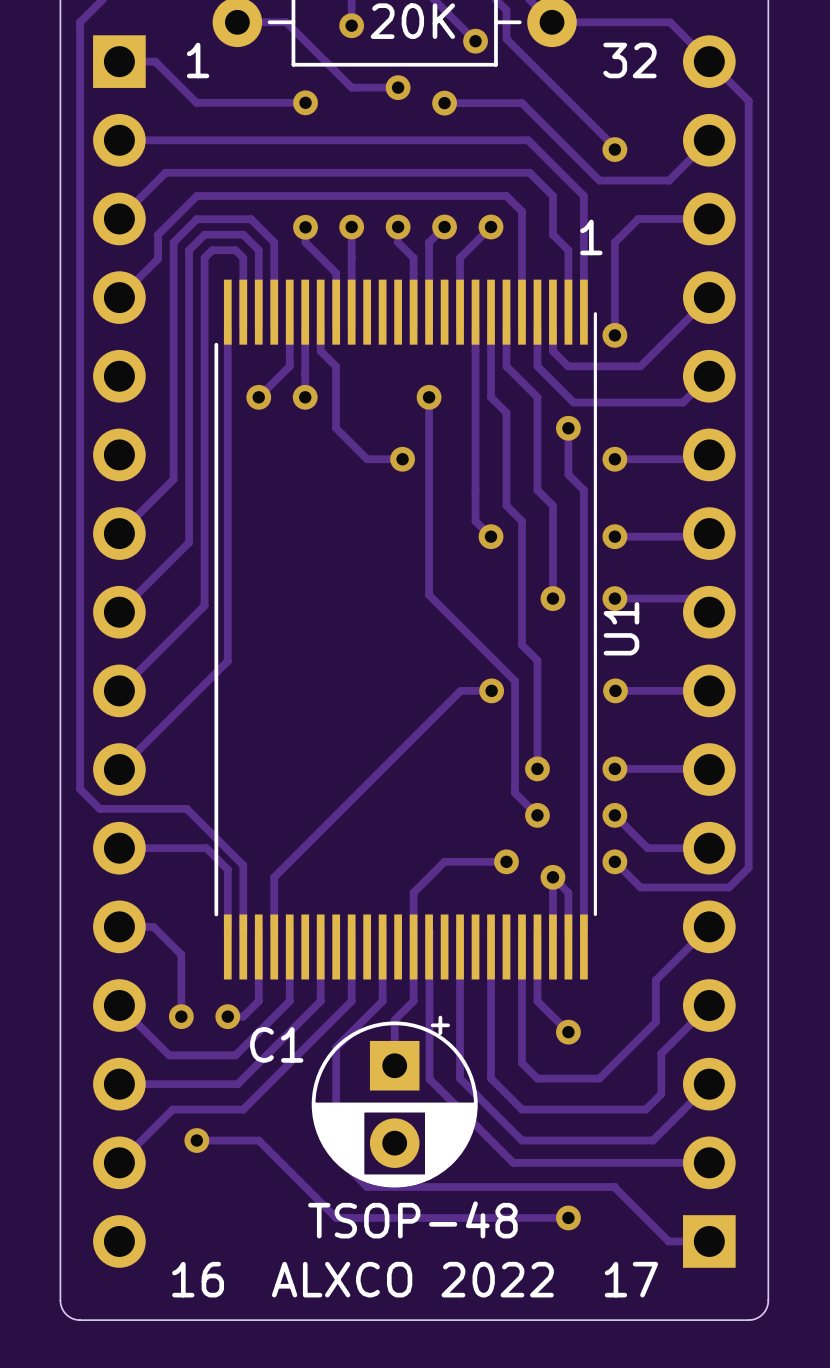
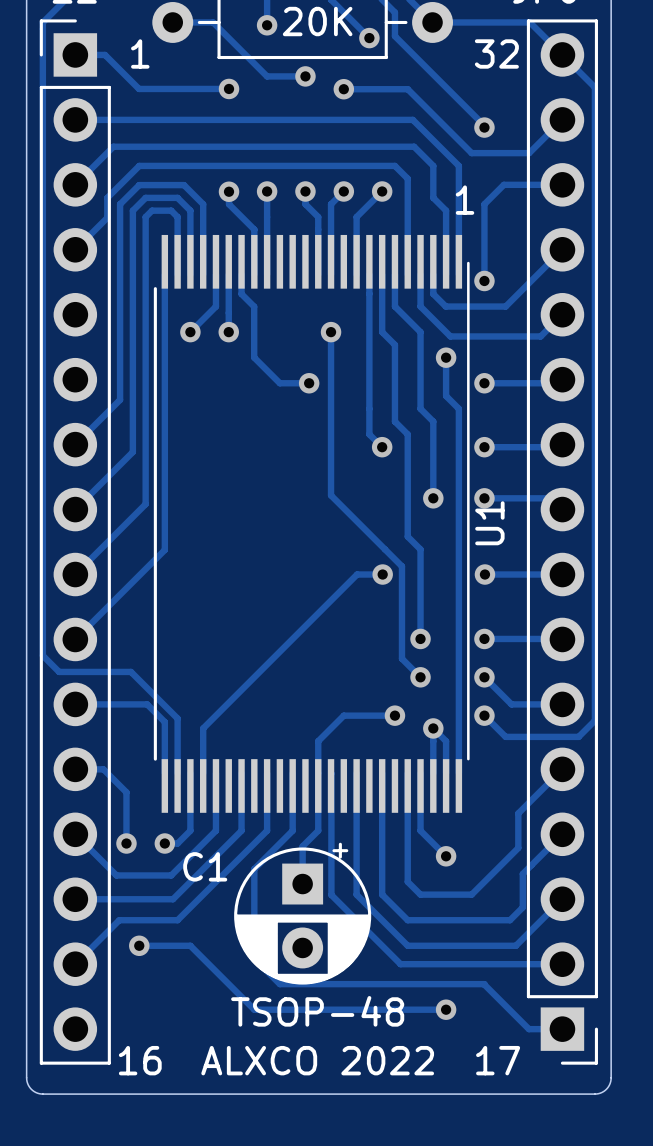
part side: bottom (119, 651) -> top (75, 542)
part side: bottom (709, 651) -> top (562, 542)

